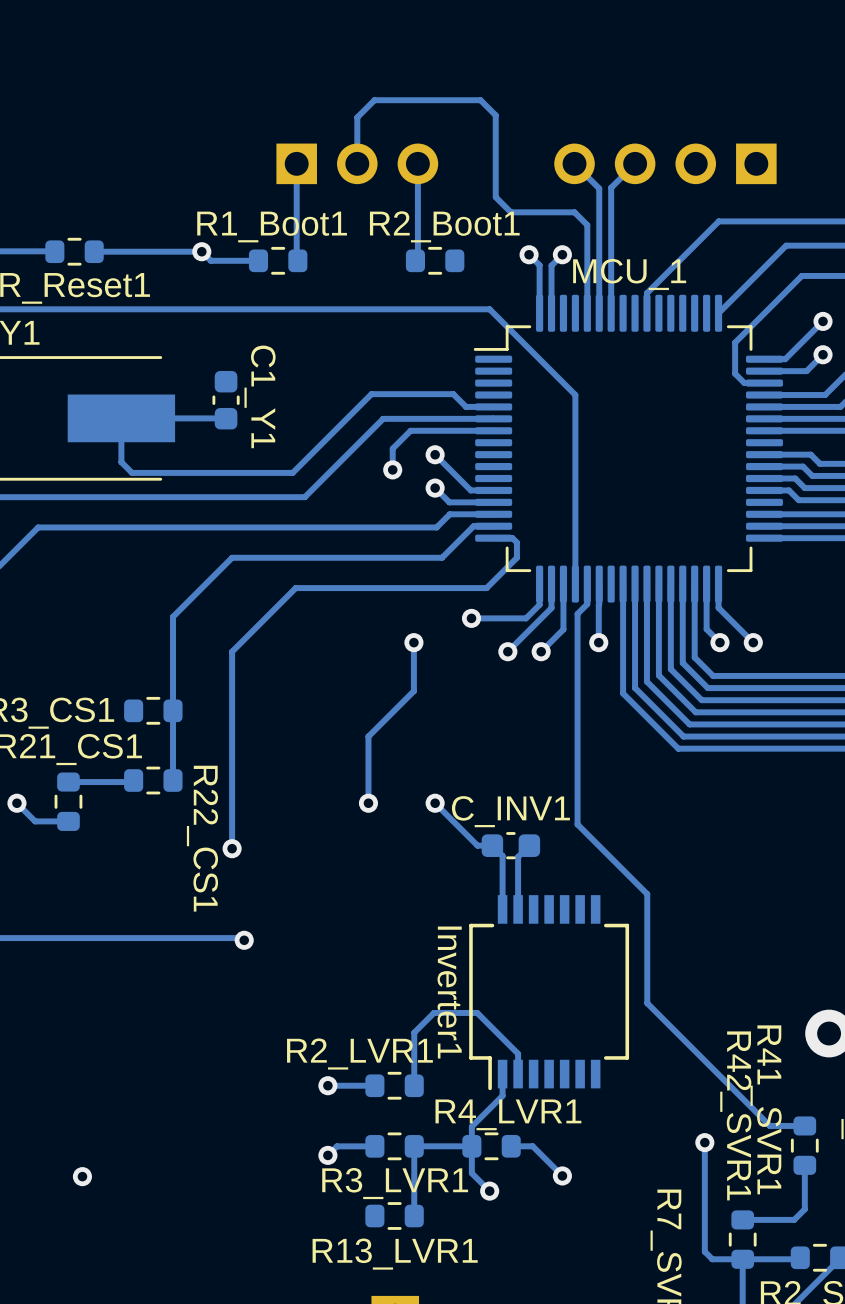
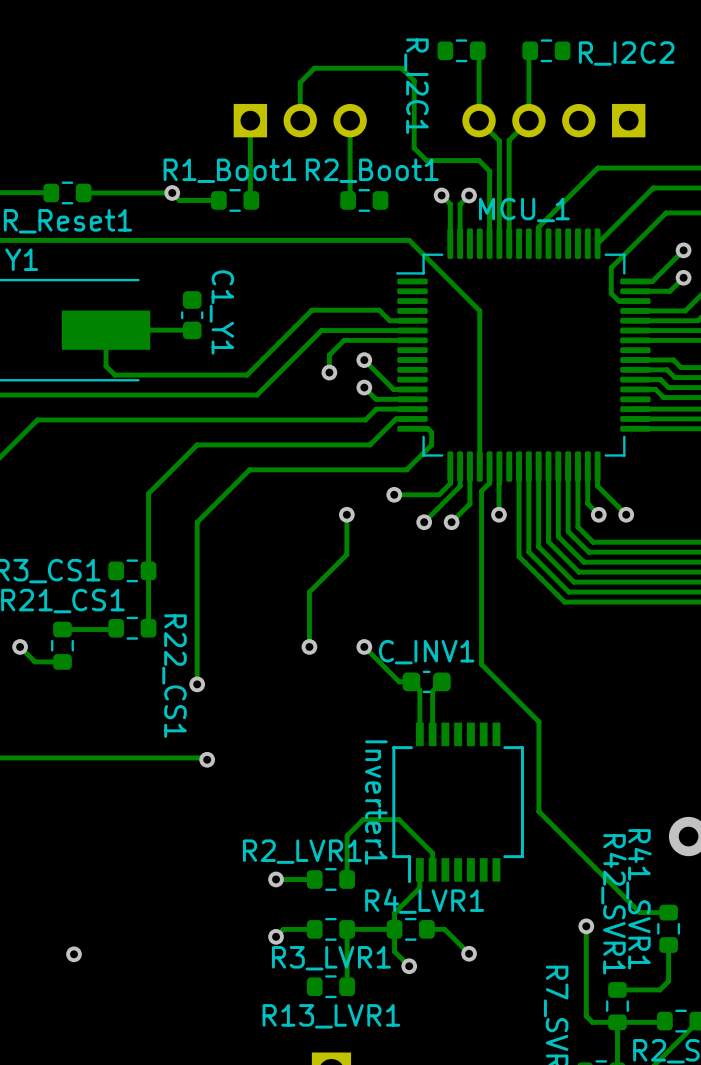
R_I2C1: none -> (461, 50)
track: none -> (477, 50) (479, 120)
track: none -> (530, 50) (528, 120)
R_I2C2: none -> (546, 50)

